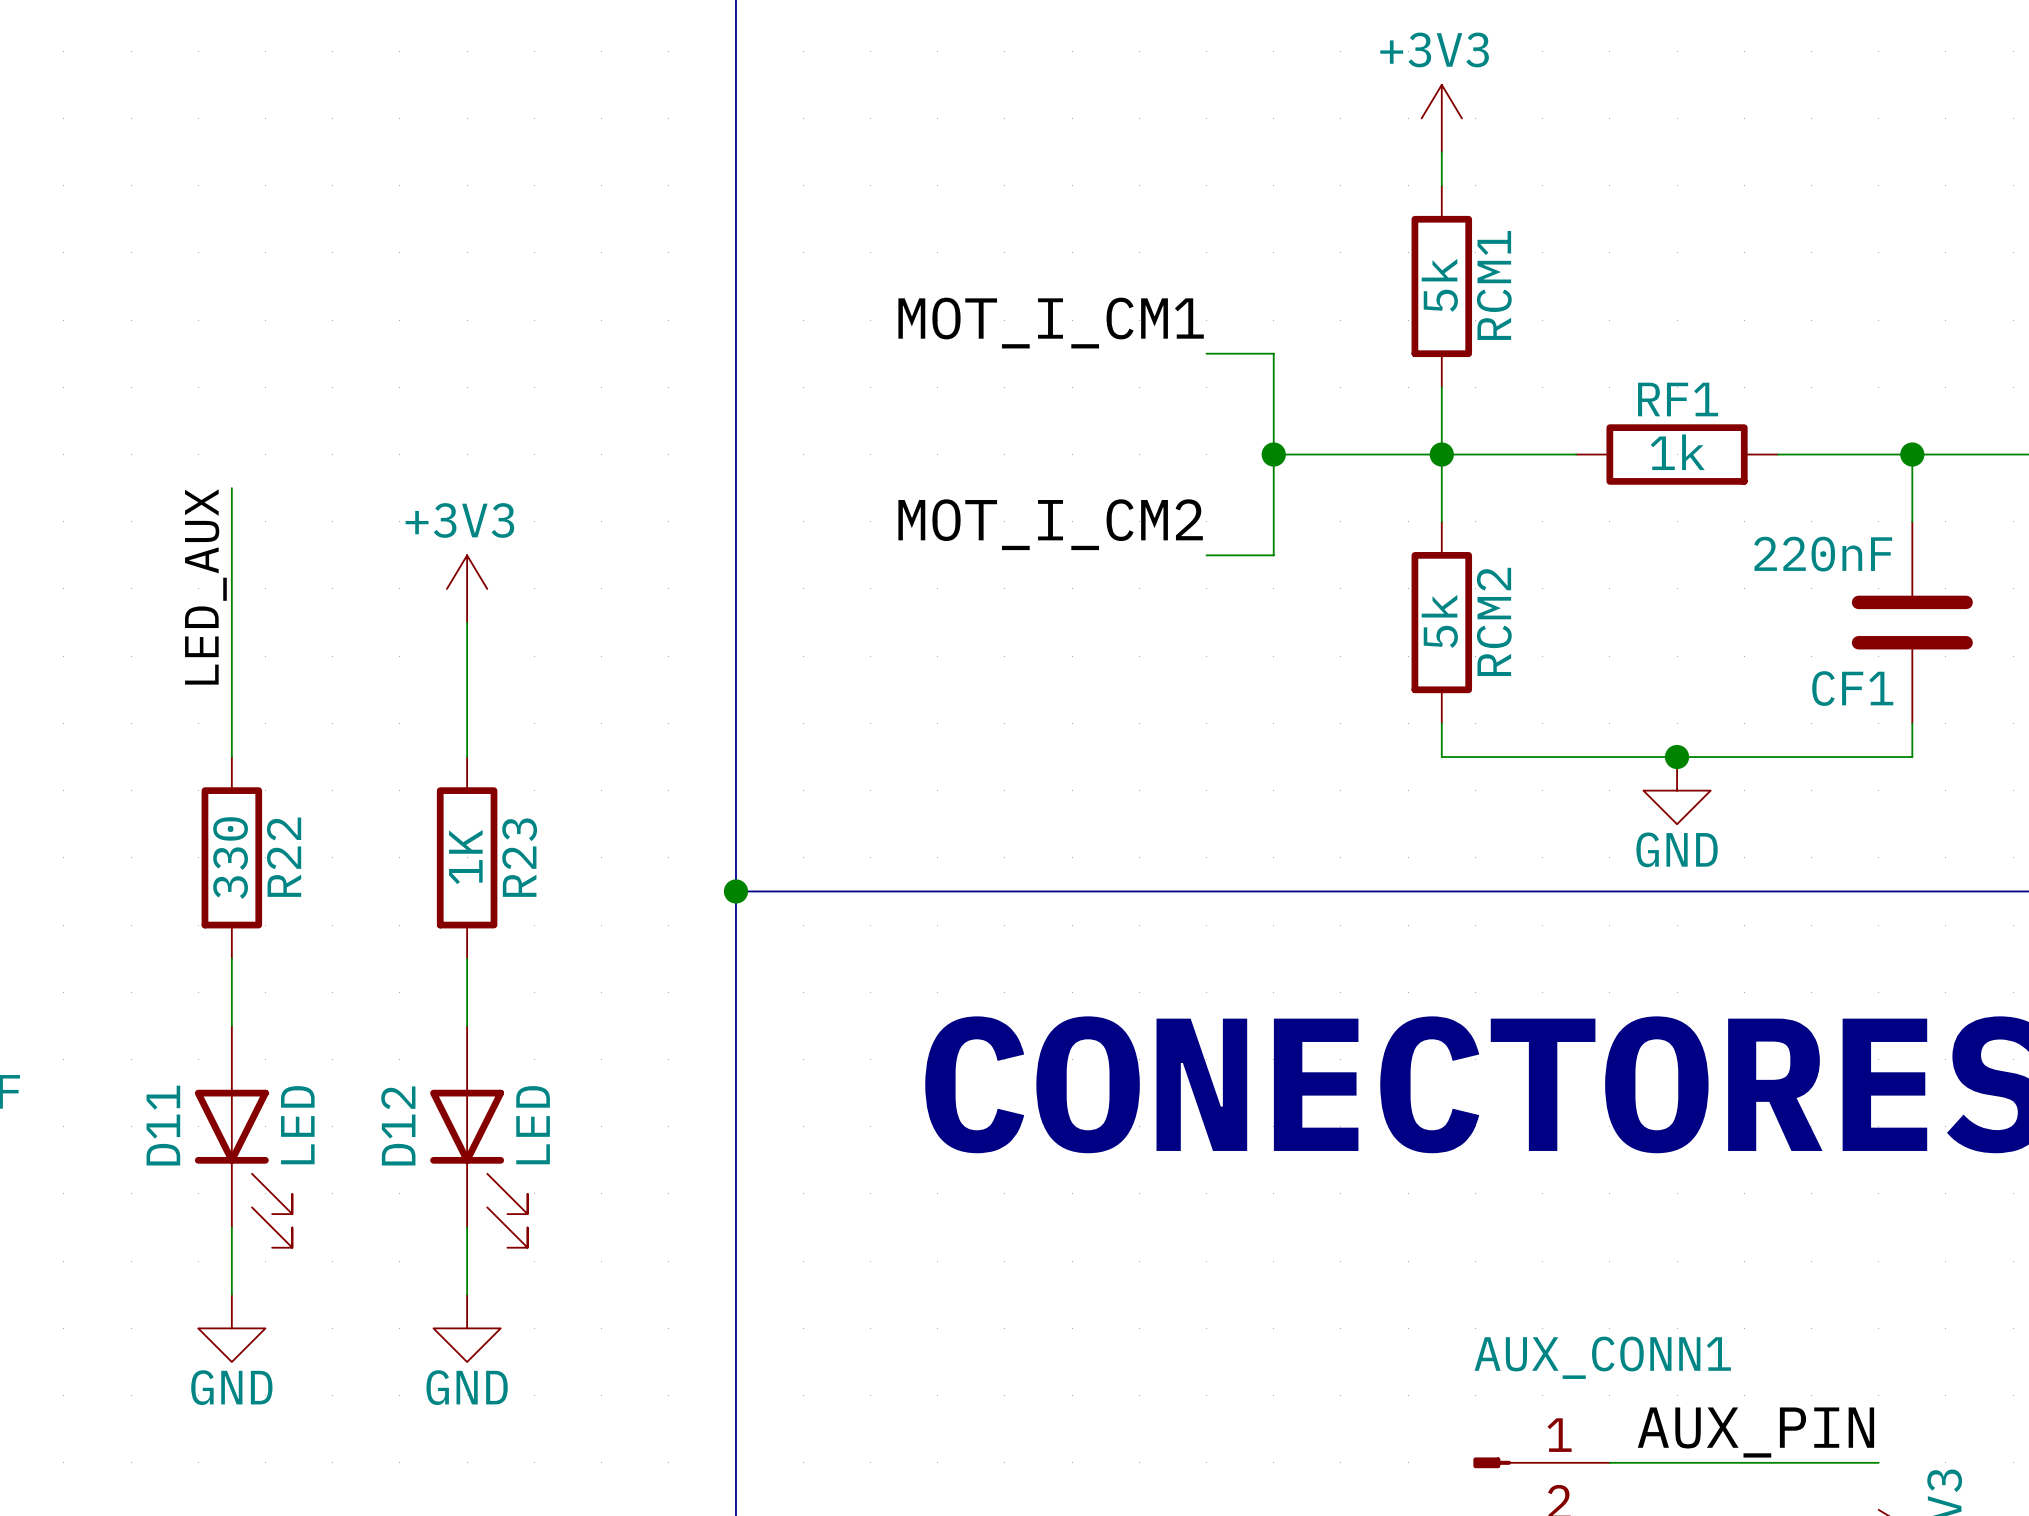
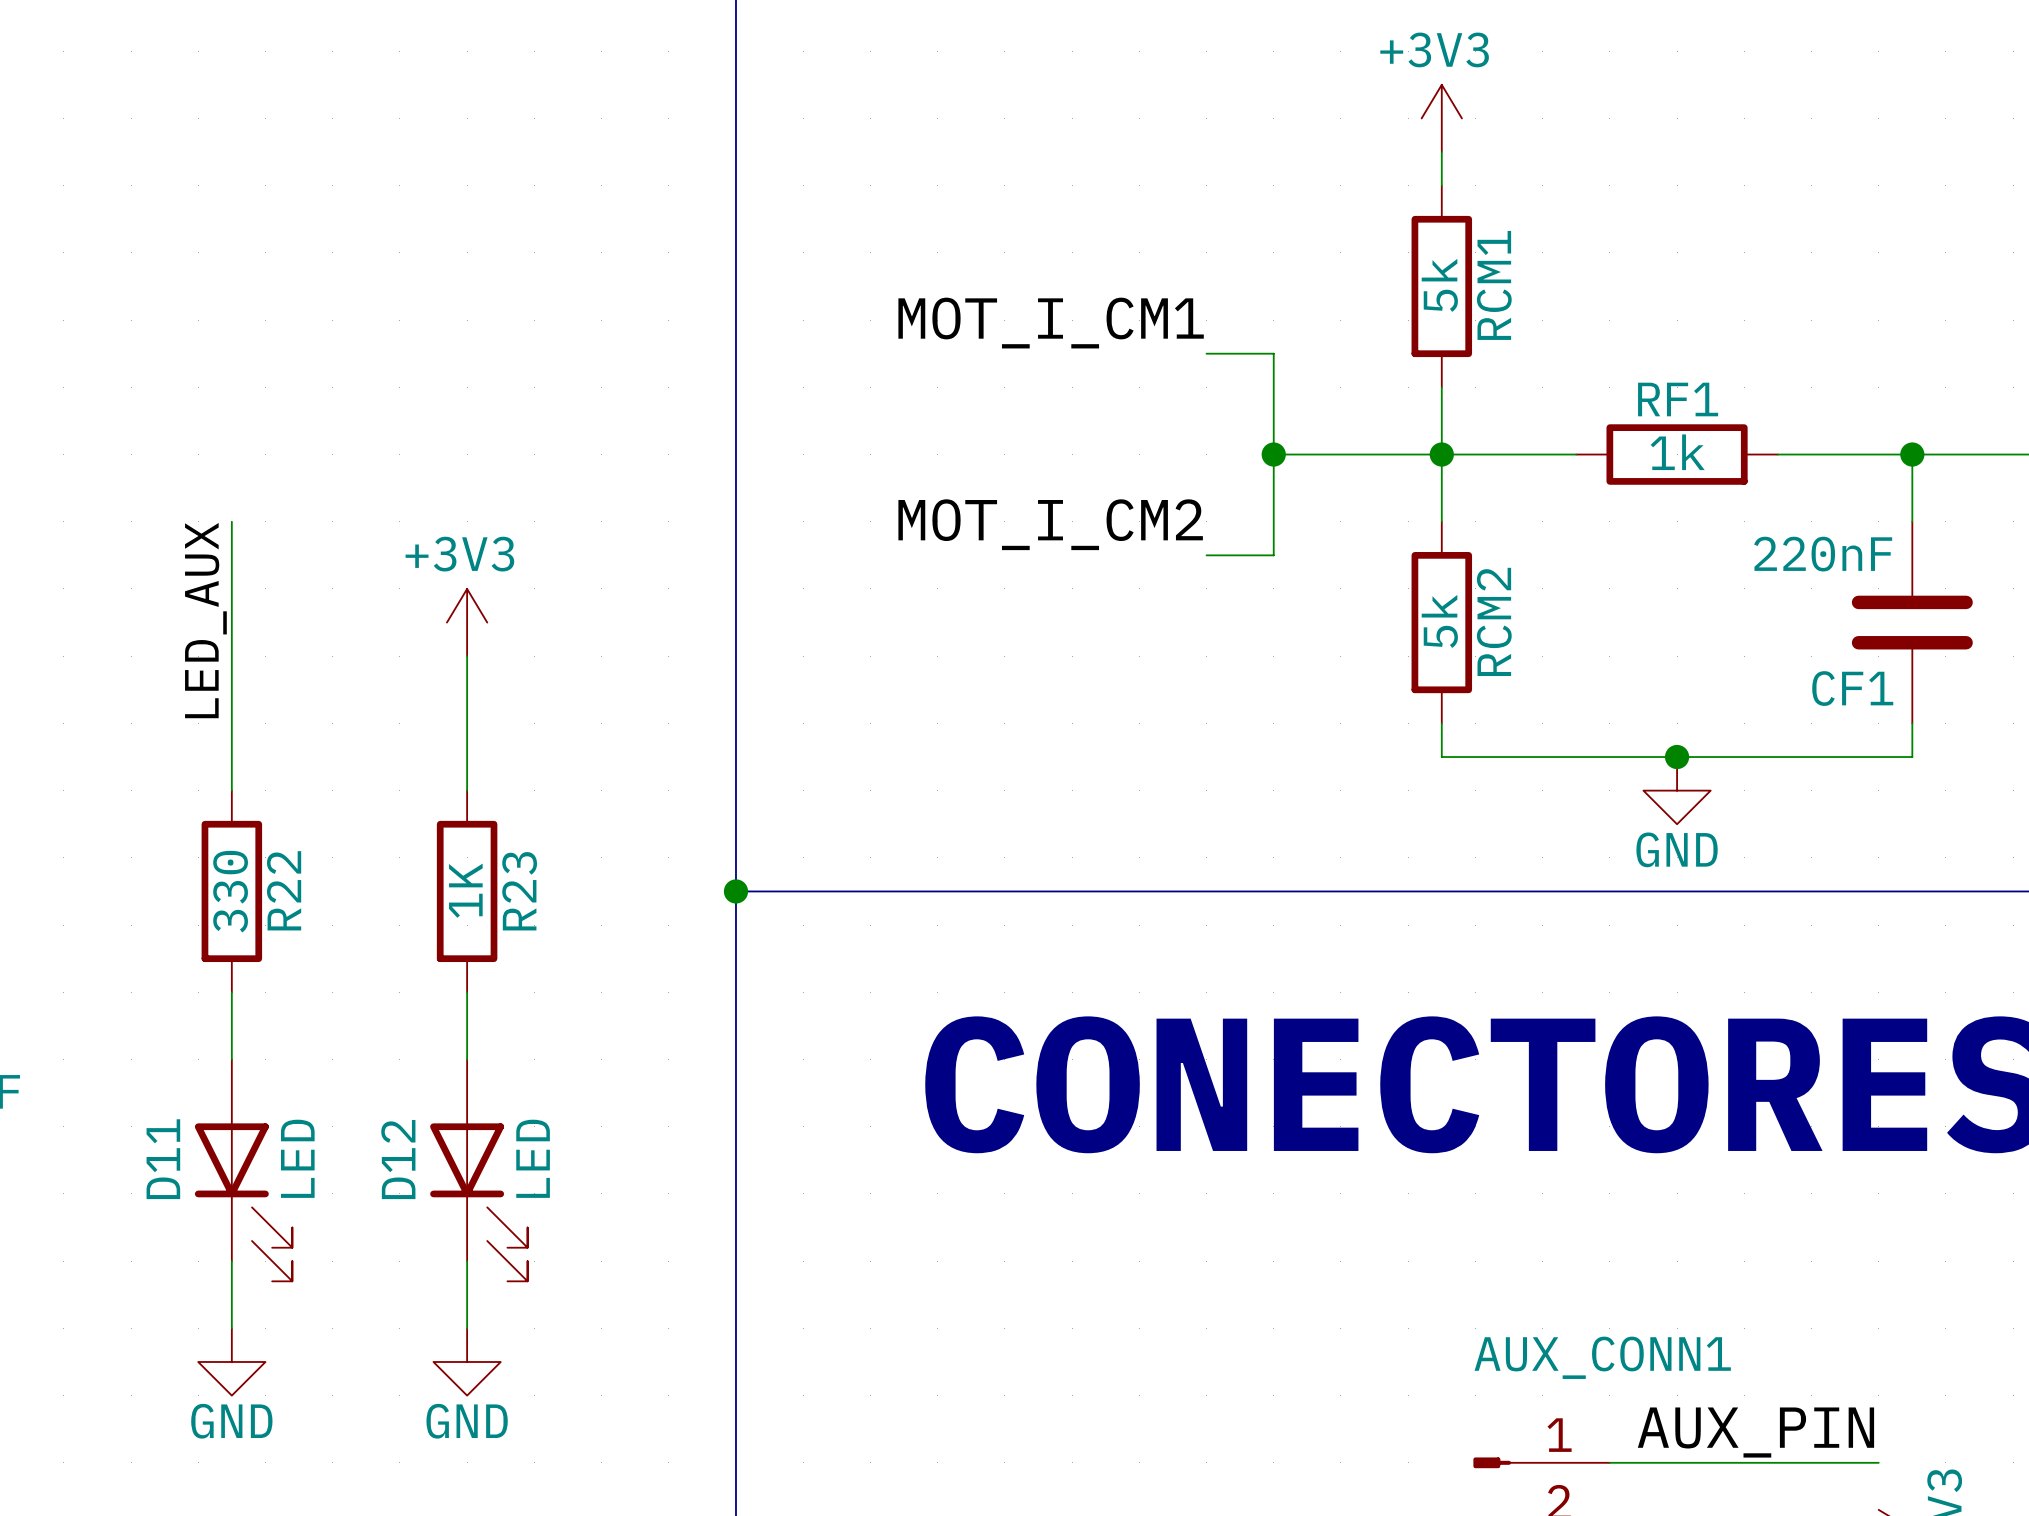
wire: (231, 488) (231, 521) -> none
label position: LED_AUX (205, 586) -> LED_AUX (205, 620)
power symbol position: +3V3 (467, 588) -> +3V3 (467, 622)
R22 position: (231, 857) -> (231, 891)
R23 position: (467, 857) -> (467, 891)
D11 position: (243, 1136) -> (243, 1170)
D12 position: (478, 1136) -> (478, 1170)
power symbol position: GND (231, 1328) -> GND (231, 1361)
power symbol position: GND (467, 1328) -> GND (467, 1361)

